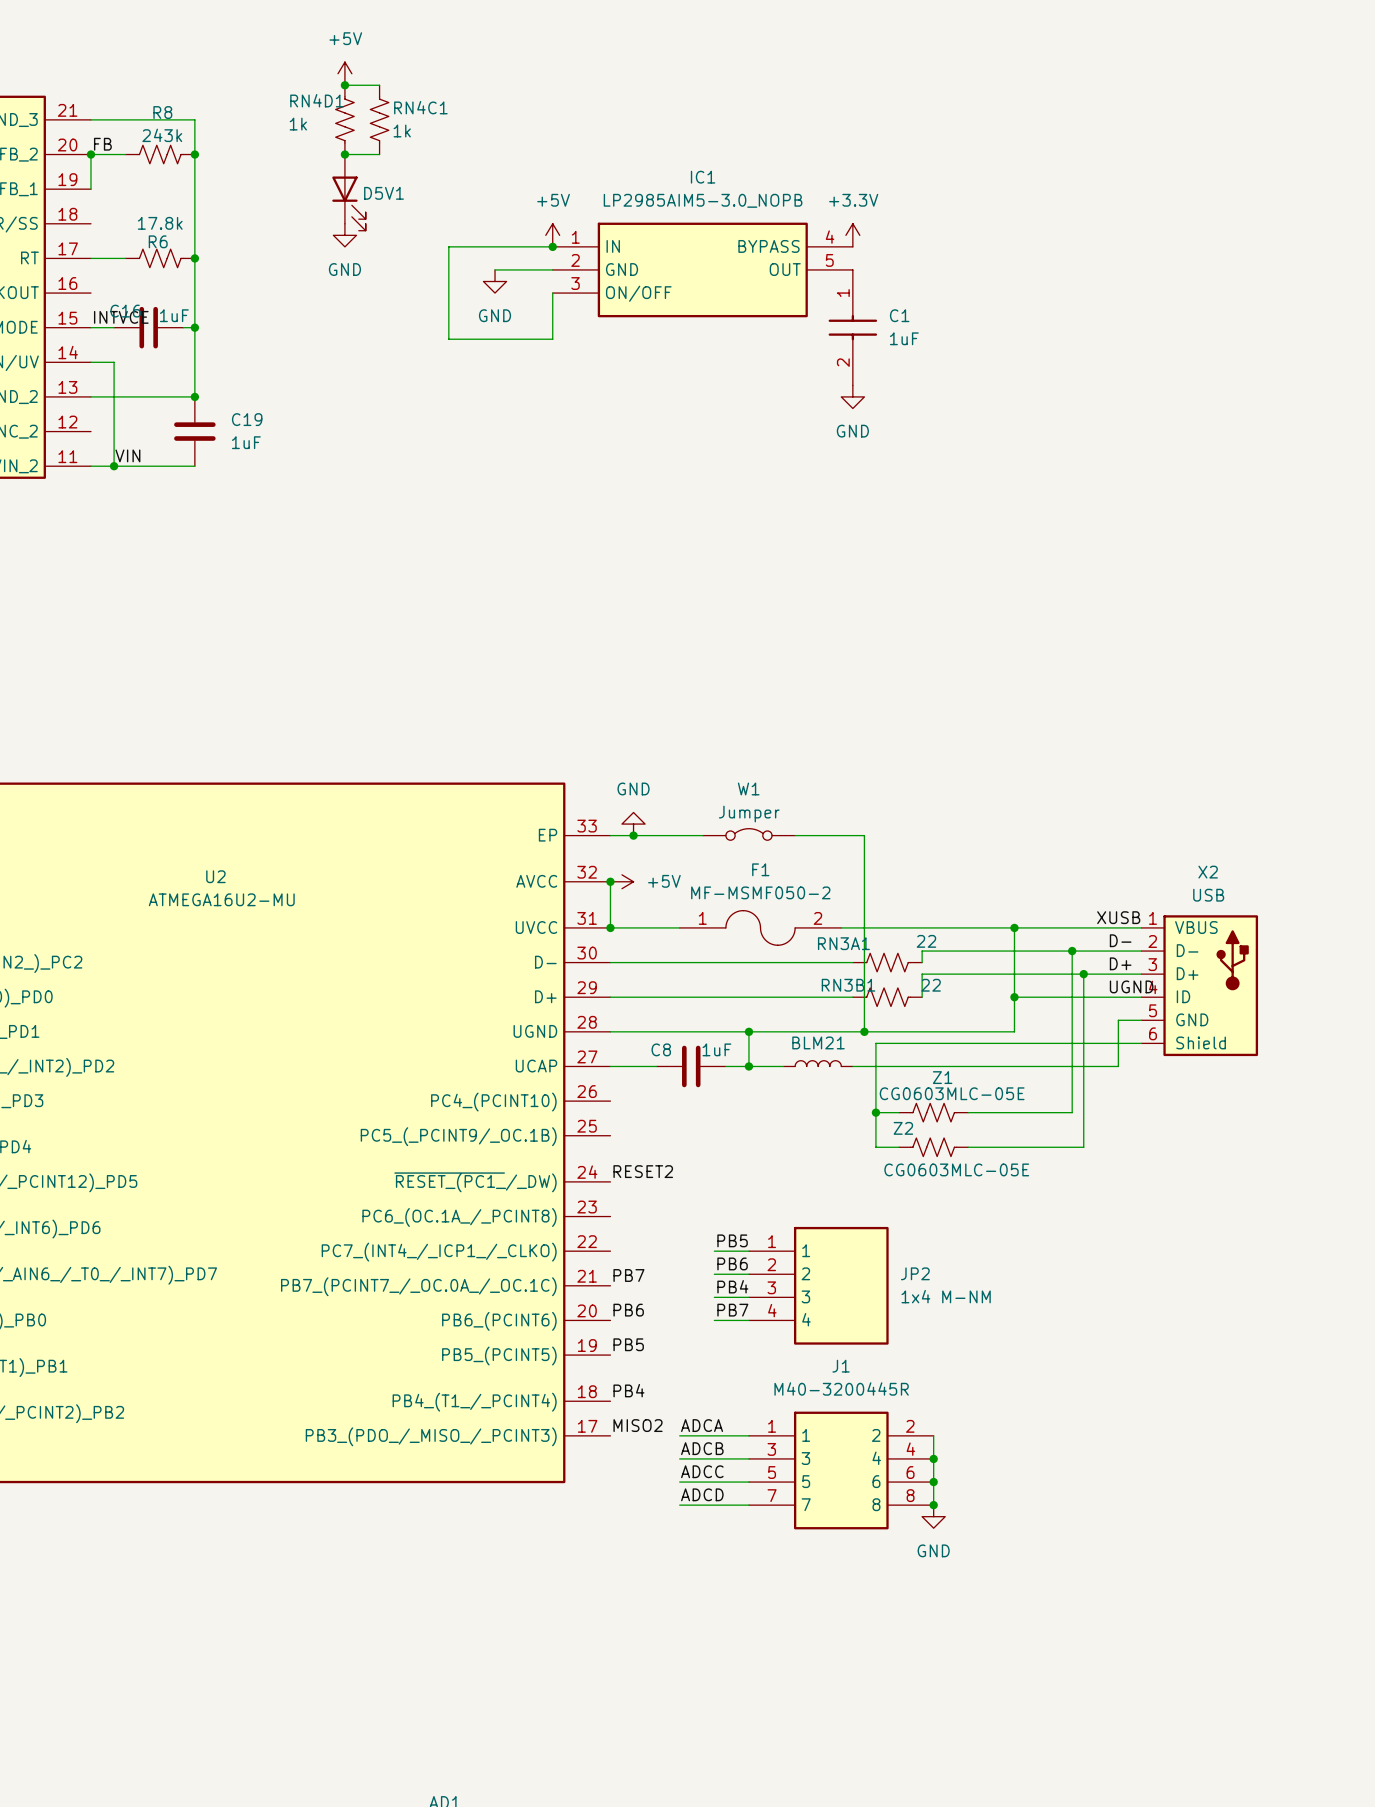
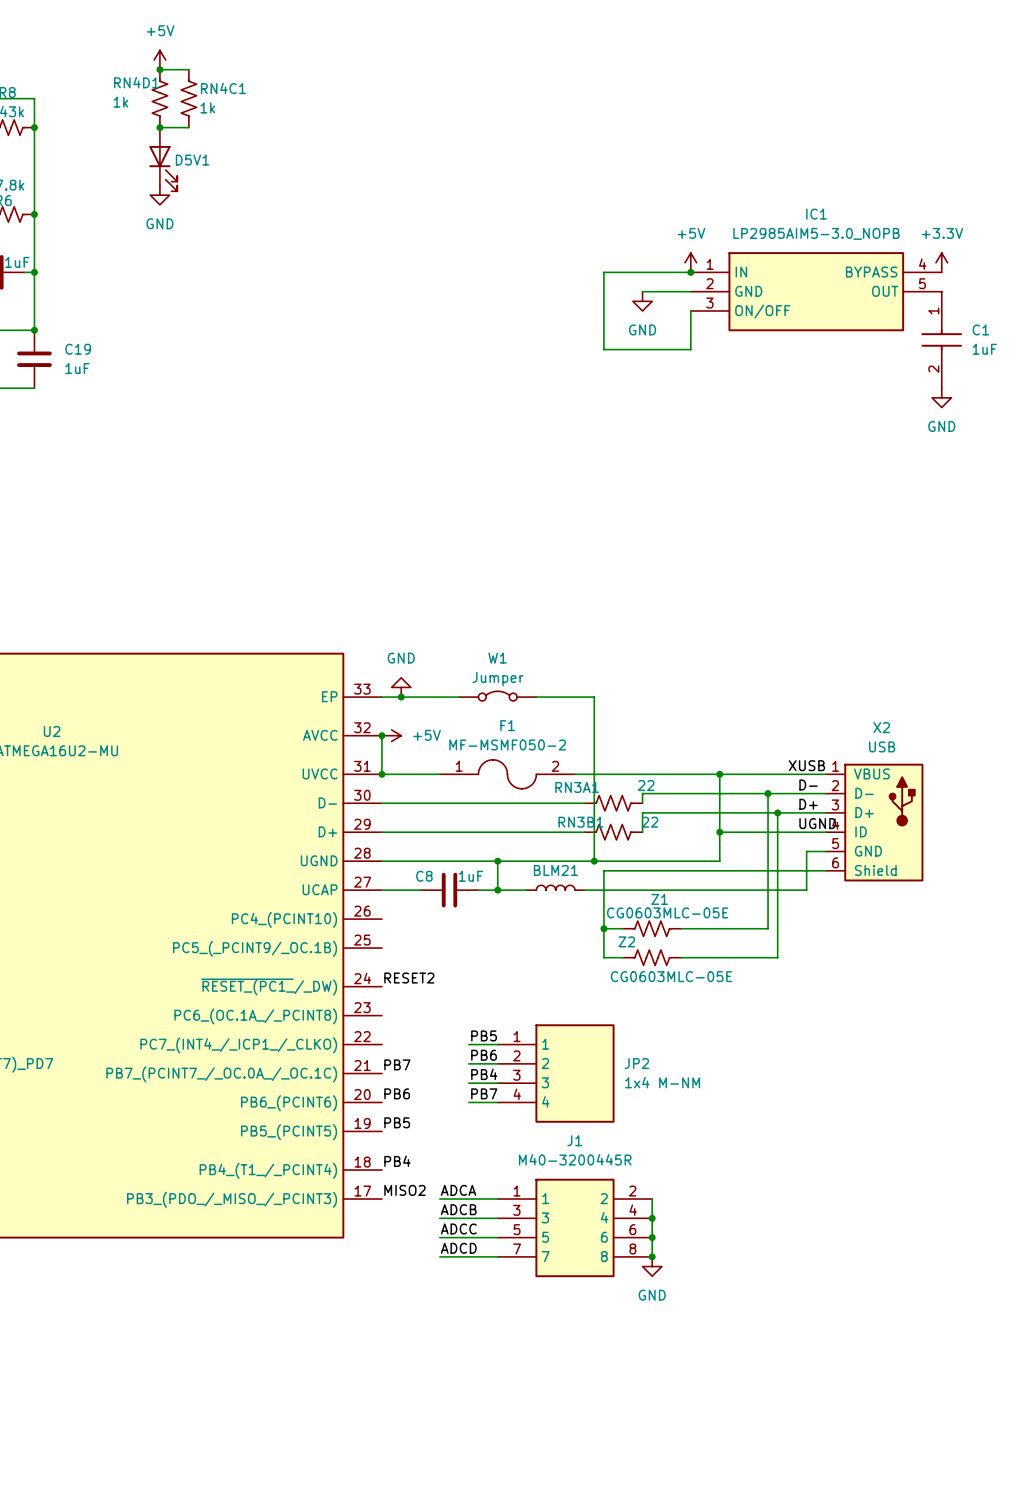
power symbol: +5V (552, 235) -> none
power symbol: +3.3V (852, 235) -> none
wire: (552, 246) (448, 246) (448, 339) (552, 339) (552, 293) -> none
junction: (552, 246) -> none
wire: (495, 269) (552, 269) -> none
IC1 position: (702, 269) -> (816, 291)
power symbol: GND (495, 281) -> none
power symbol: none -> +5V (690, 262)
power symbol: none -> +3.3V (941, 262)
C1 position: (852, 327) -> (941, 339)
wire: none -> (690, 272) (603, 272) (603, 349) (690, 349) (690, 310)
junction: none -> (690, 272)
wire: none -> (642, 291) (690, 291)
power symbol position: GND (852, 396) -> GND (642, 301)
power symbol: none -> GND (941, 397)

